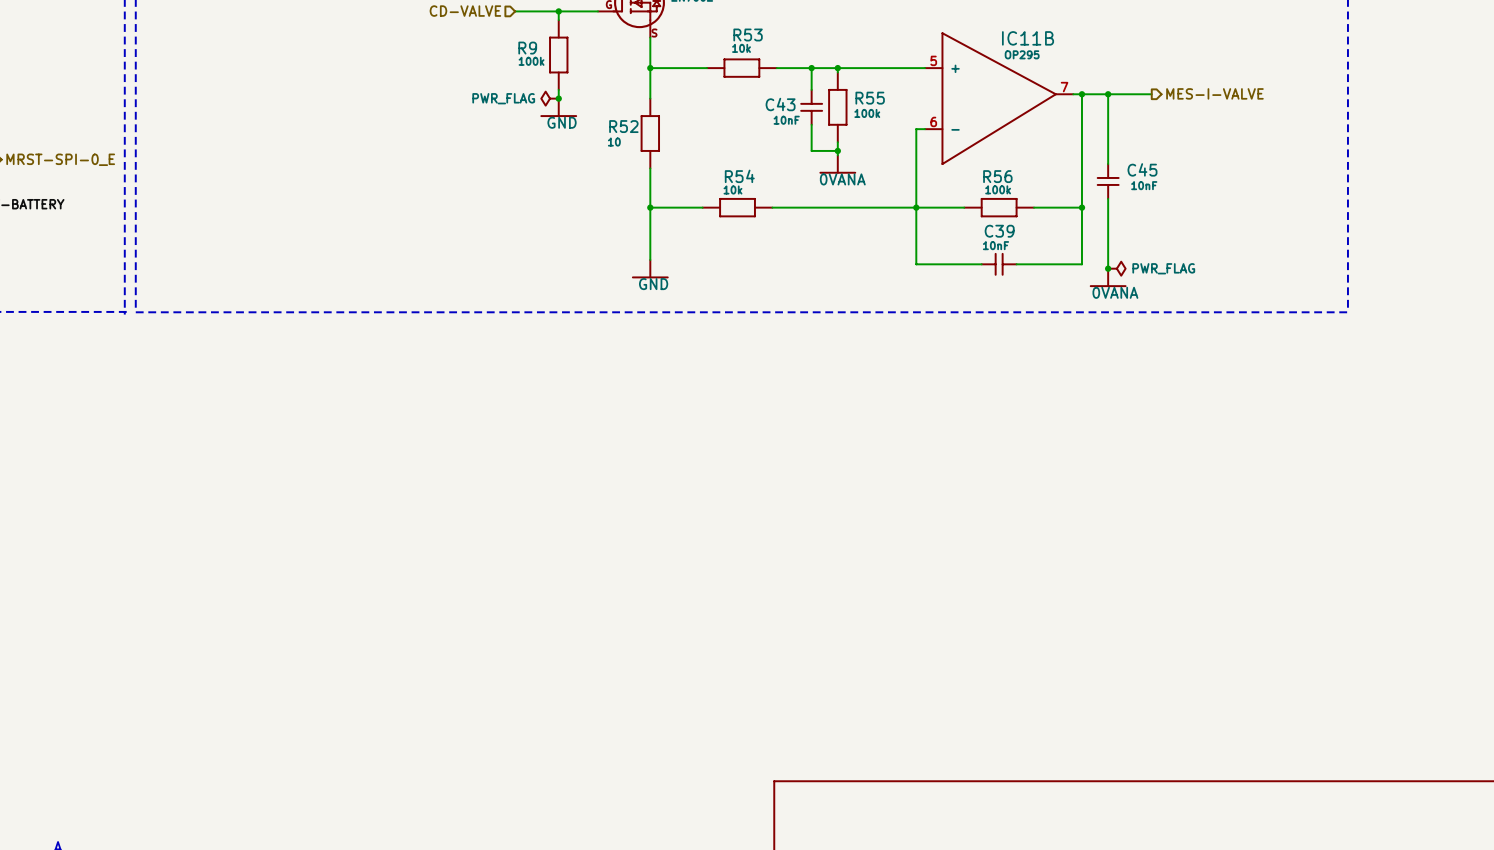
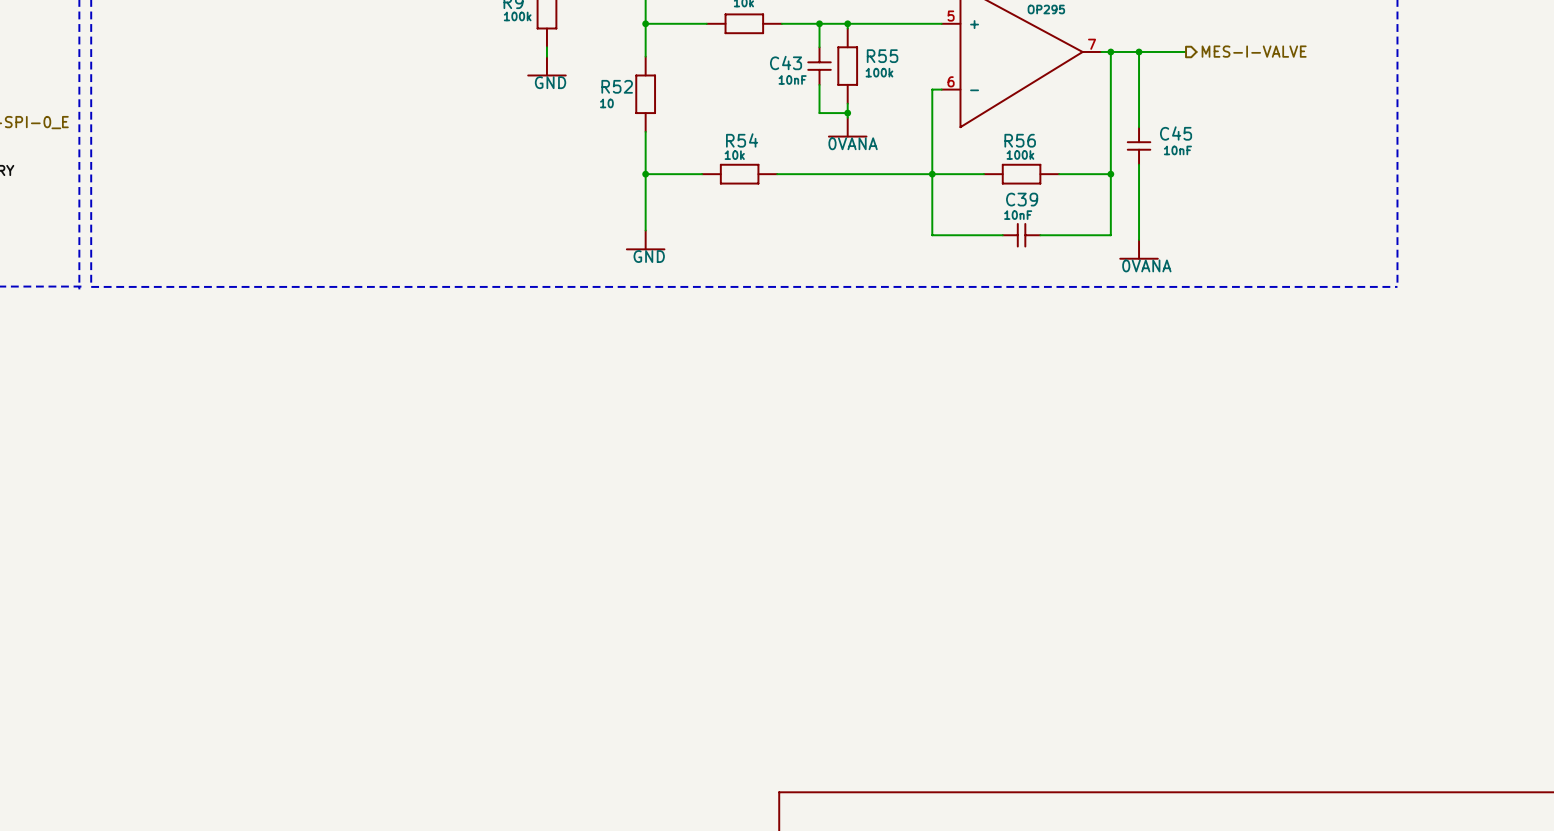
power symbol: PWR_FLAG (550, 98) -> none
junction: (558, 98) -> none
junction: (1108, 268) -> none
power symbol: PWR_FLAG (1116, 268) -> none

